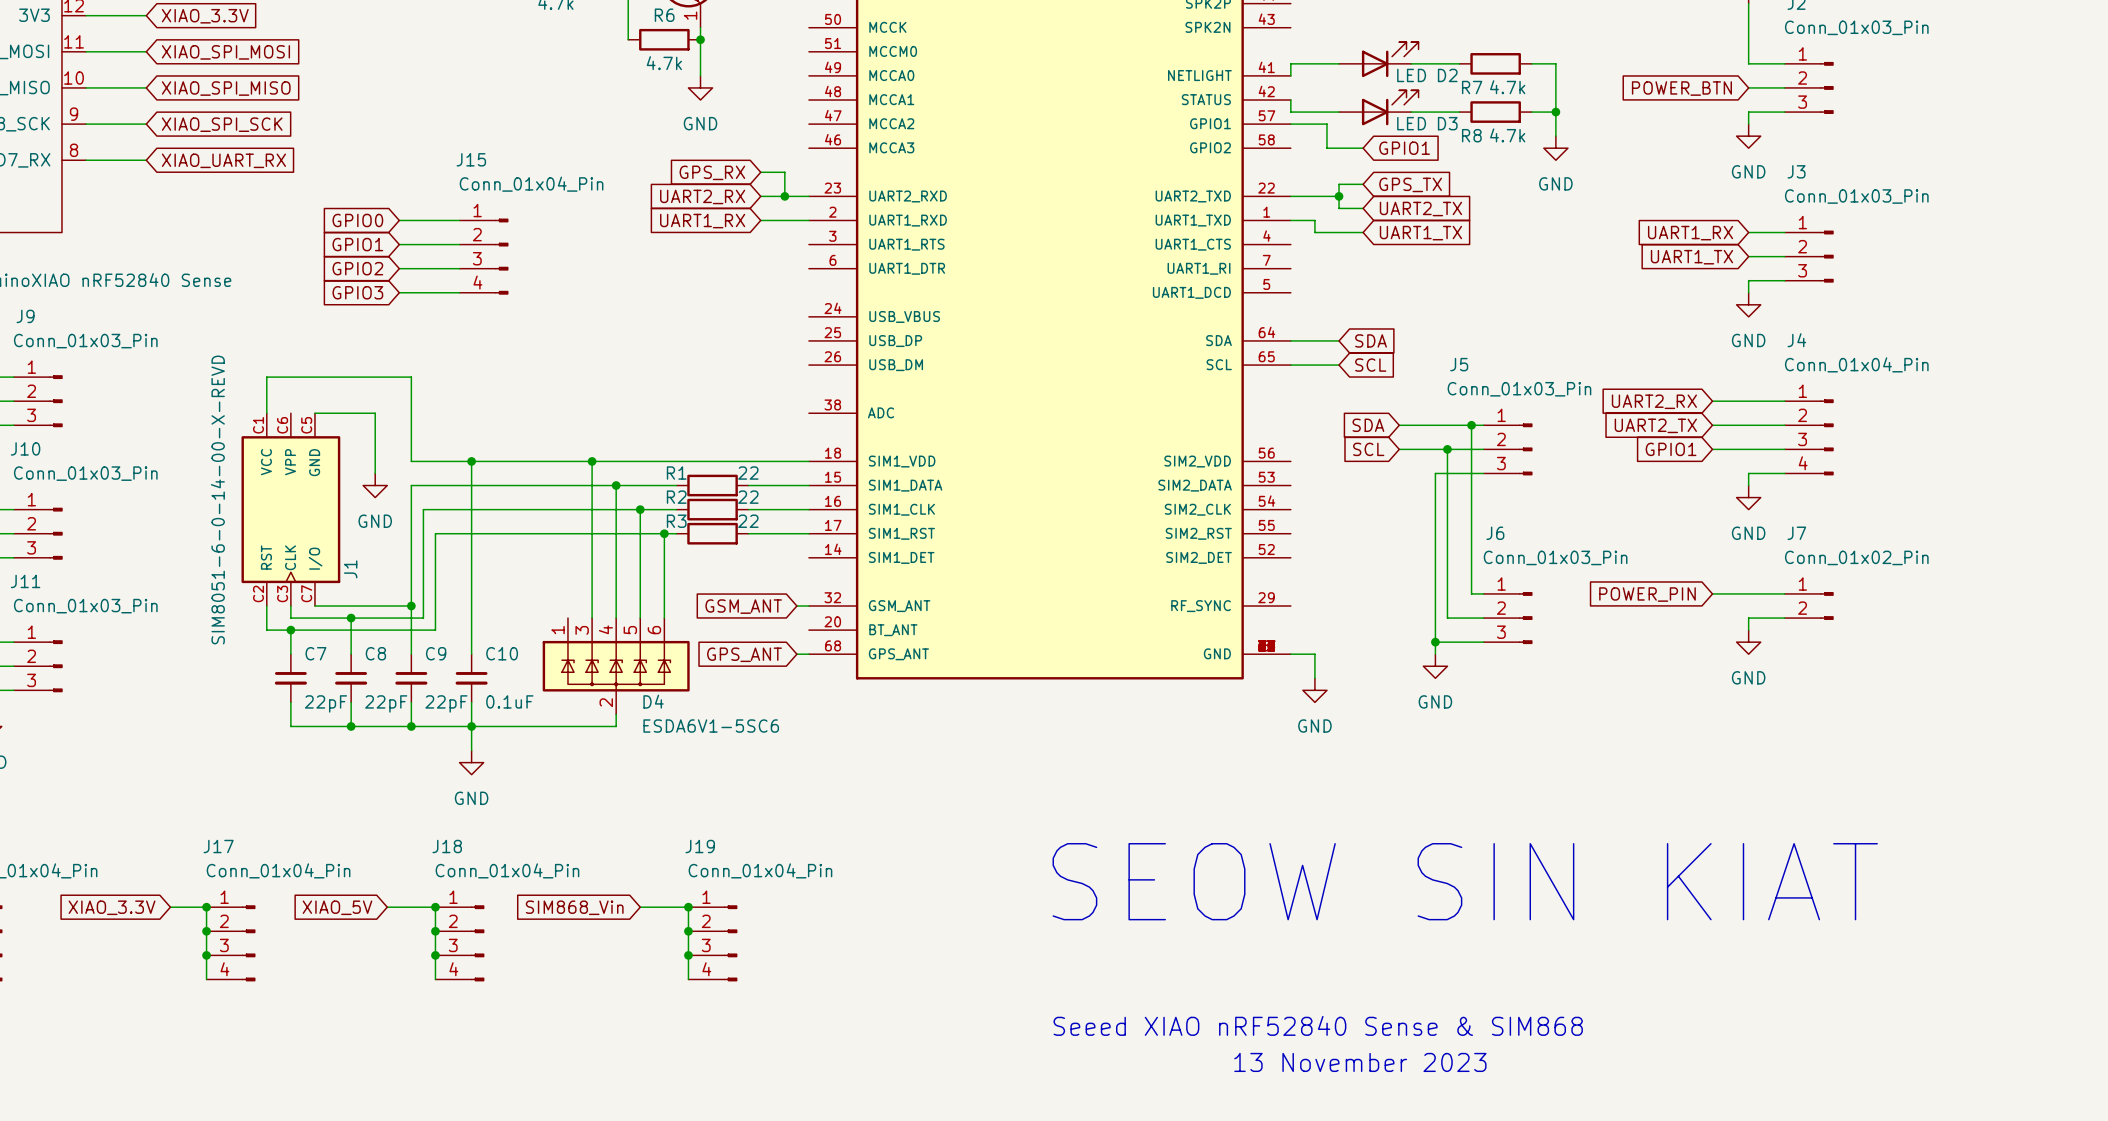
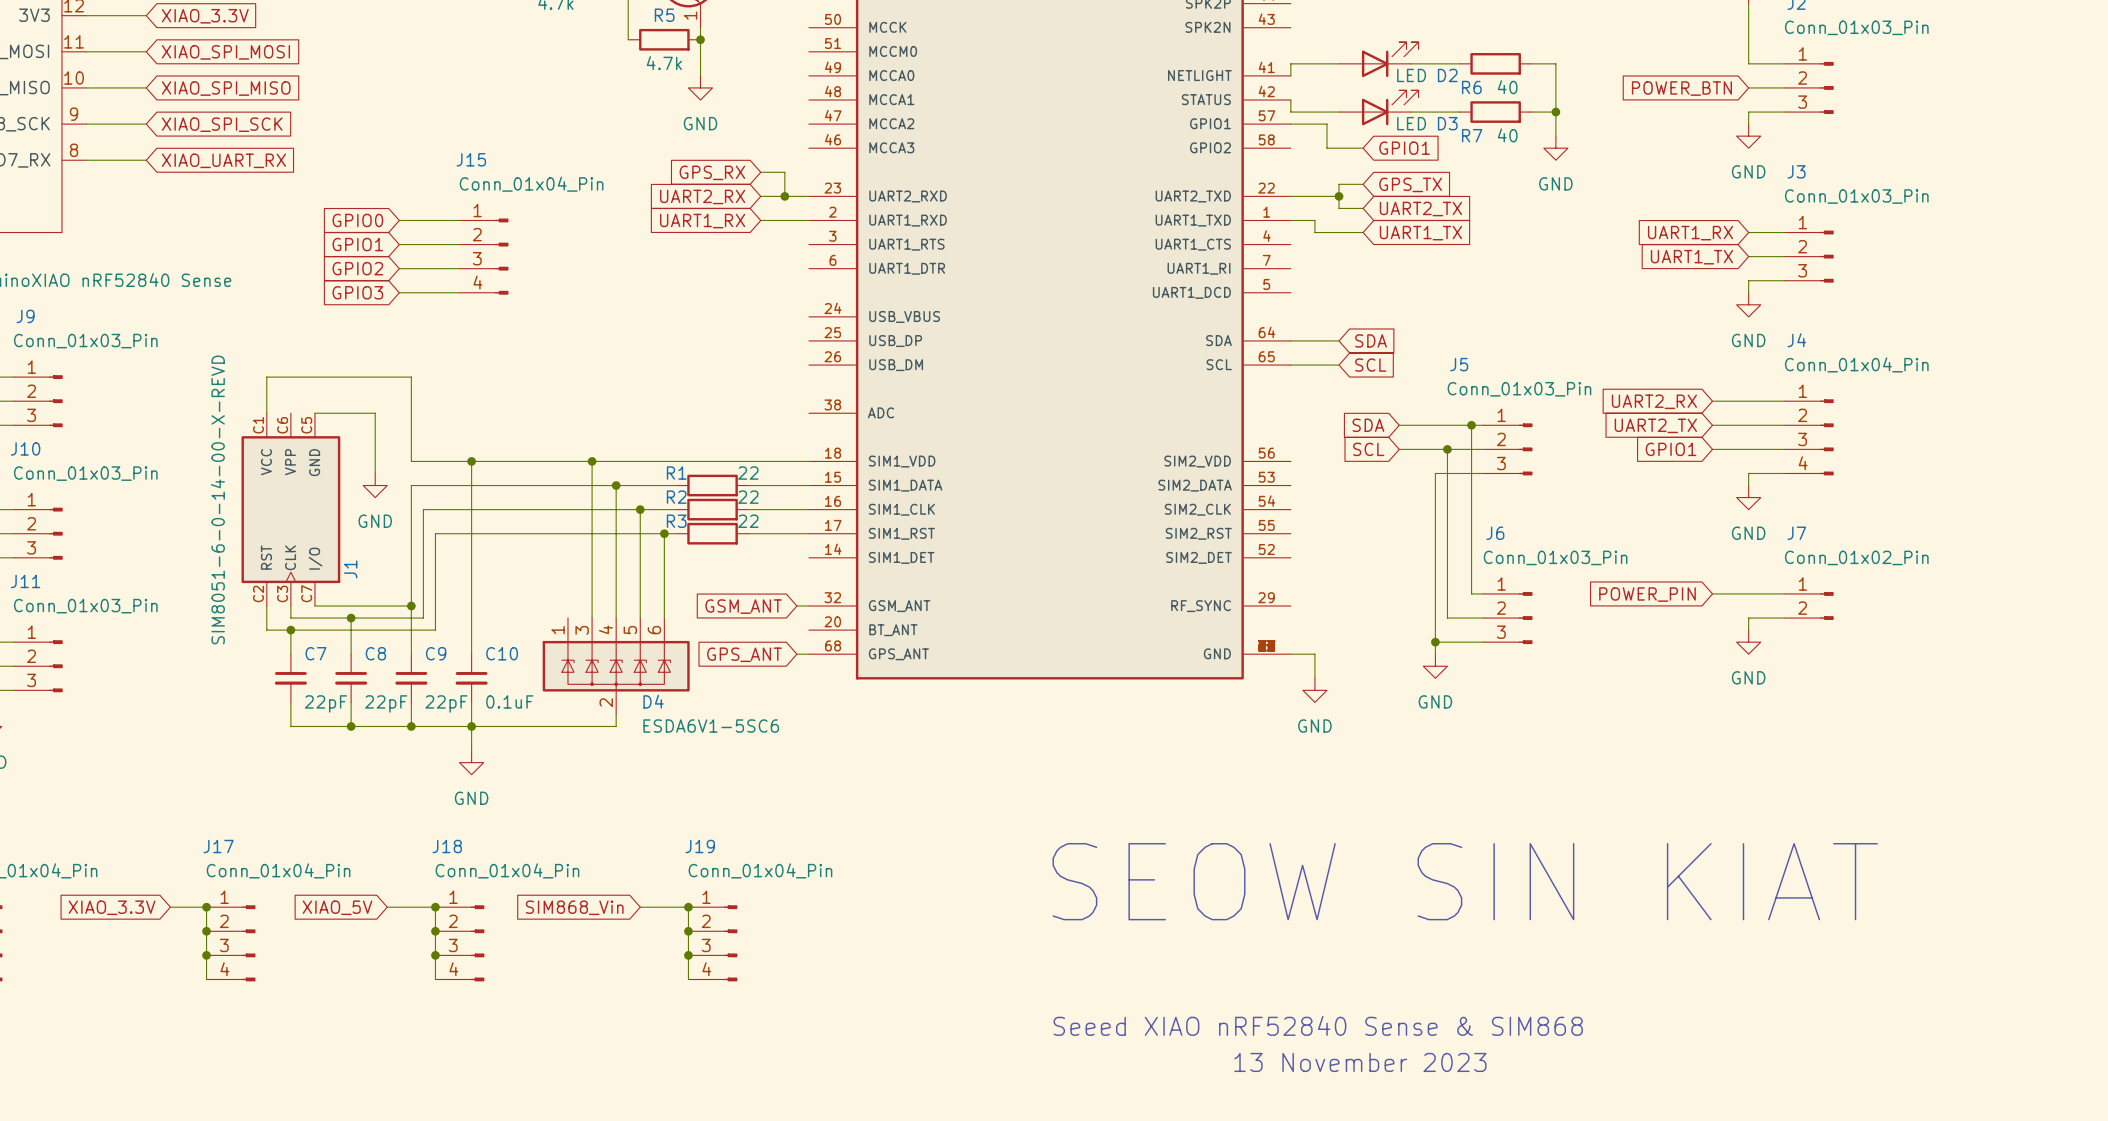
R6 name: R6 (664, 15) -> R5 (664, 15)
R7 name: R7 (1472, 87) -> R6 (1471, 87)
R7 value: 4.7k (1507, 87) -> 40 (1507, 87)
R8 name: R8 (1471, 135) -> R7 (1472, 135)
R8 value: 4.7k (1507, 135) -> 40 (1507, 135)

